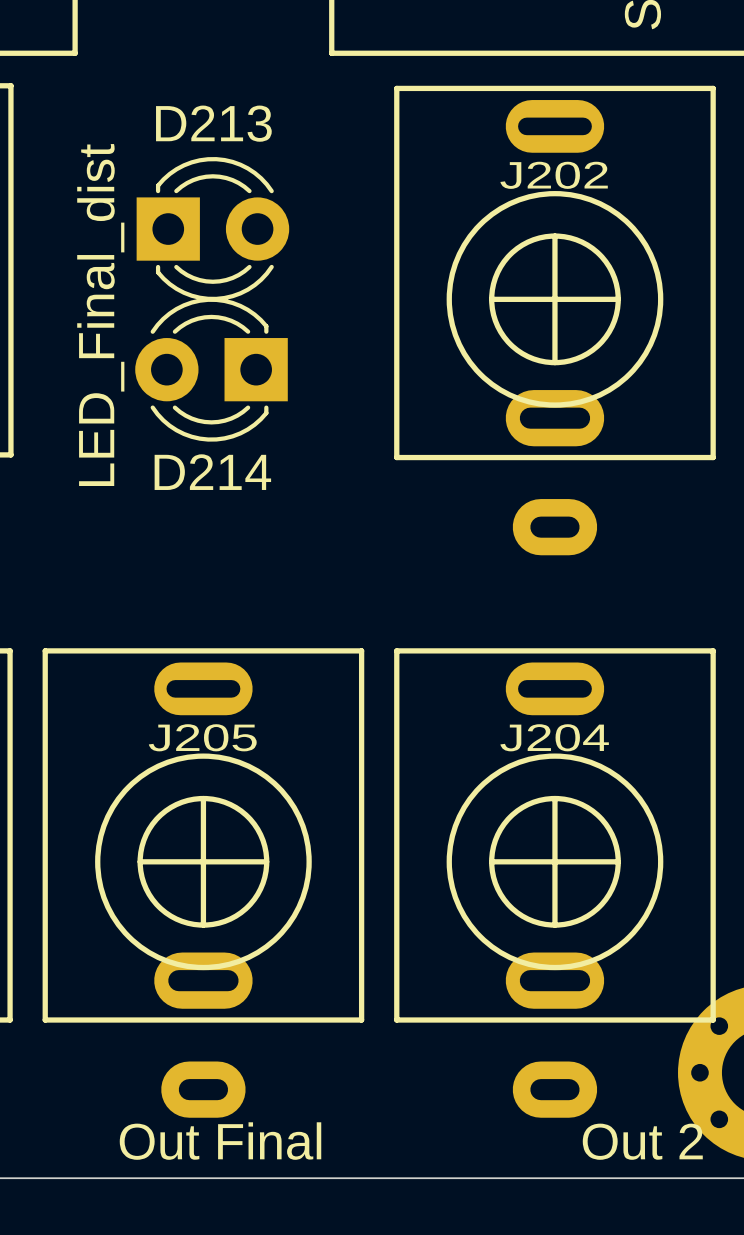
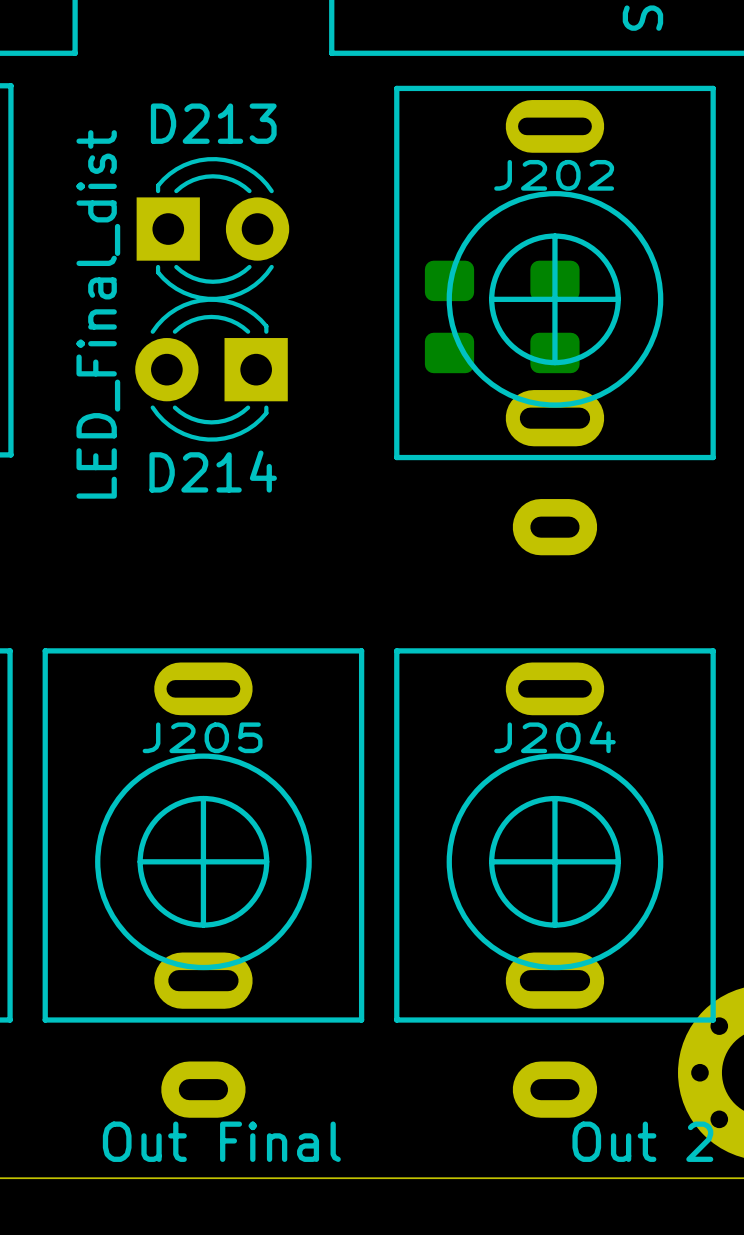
part: none -> (449, 316)
part: none -> (554, 316)

